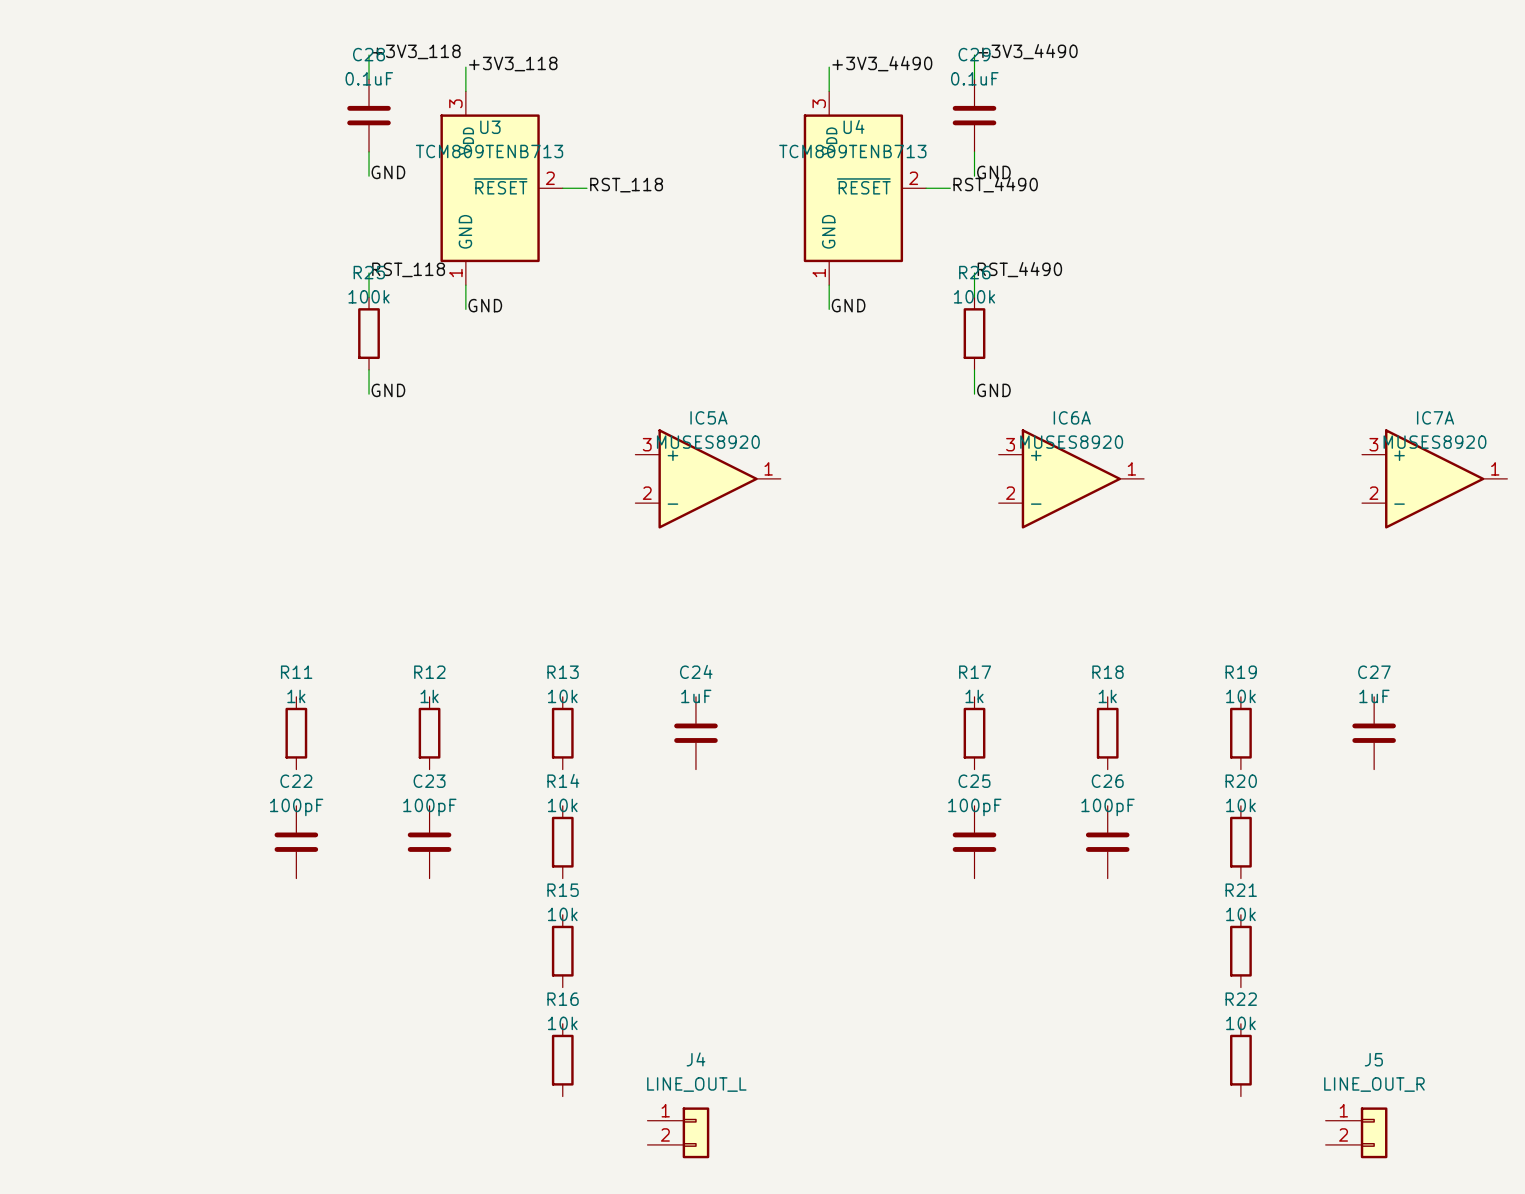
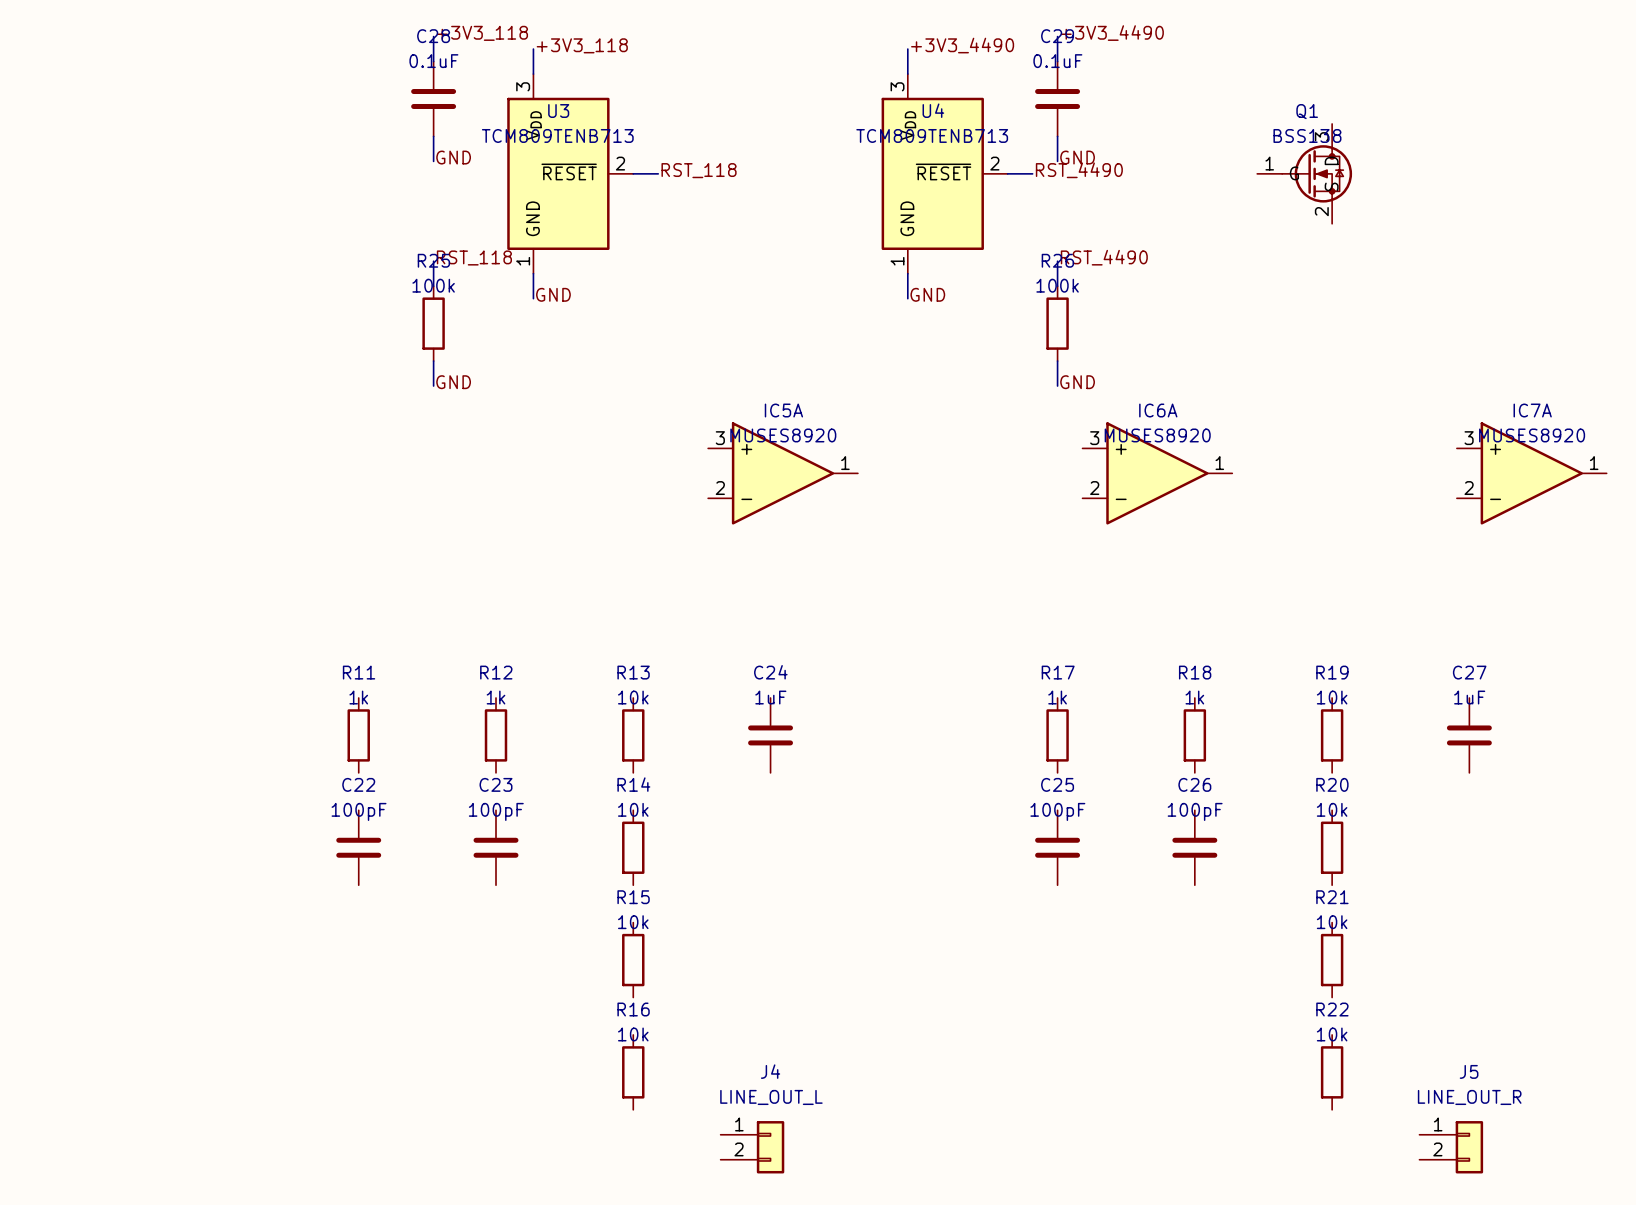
Q1: none -> BSS138 (1304, 173)

